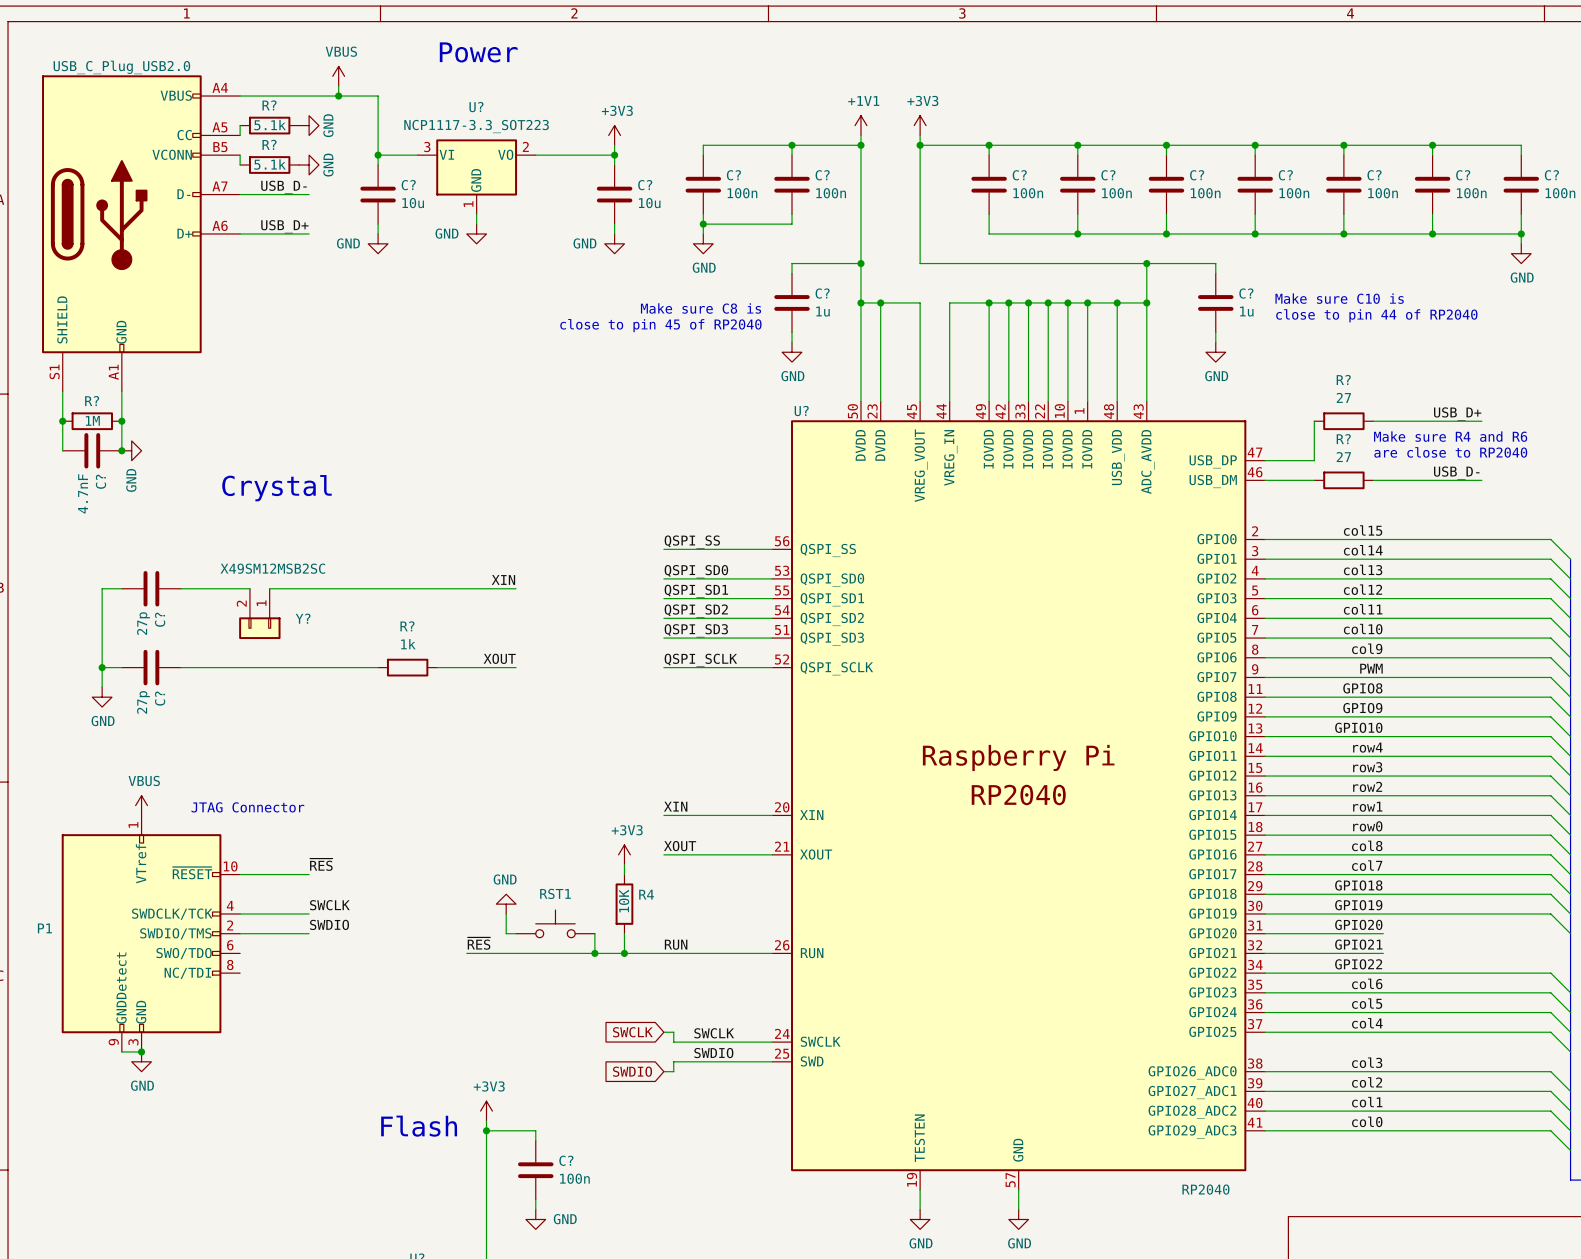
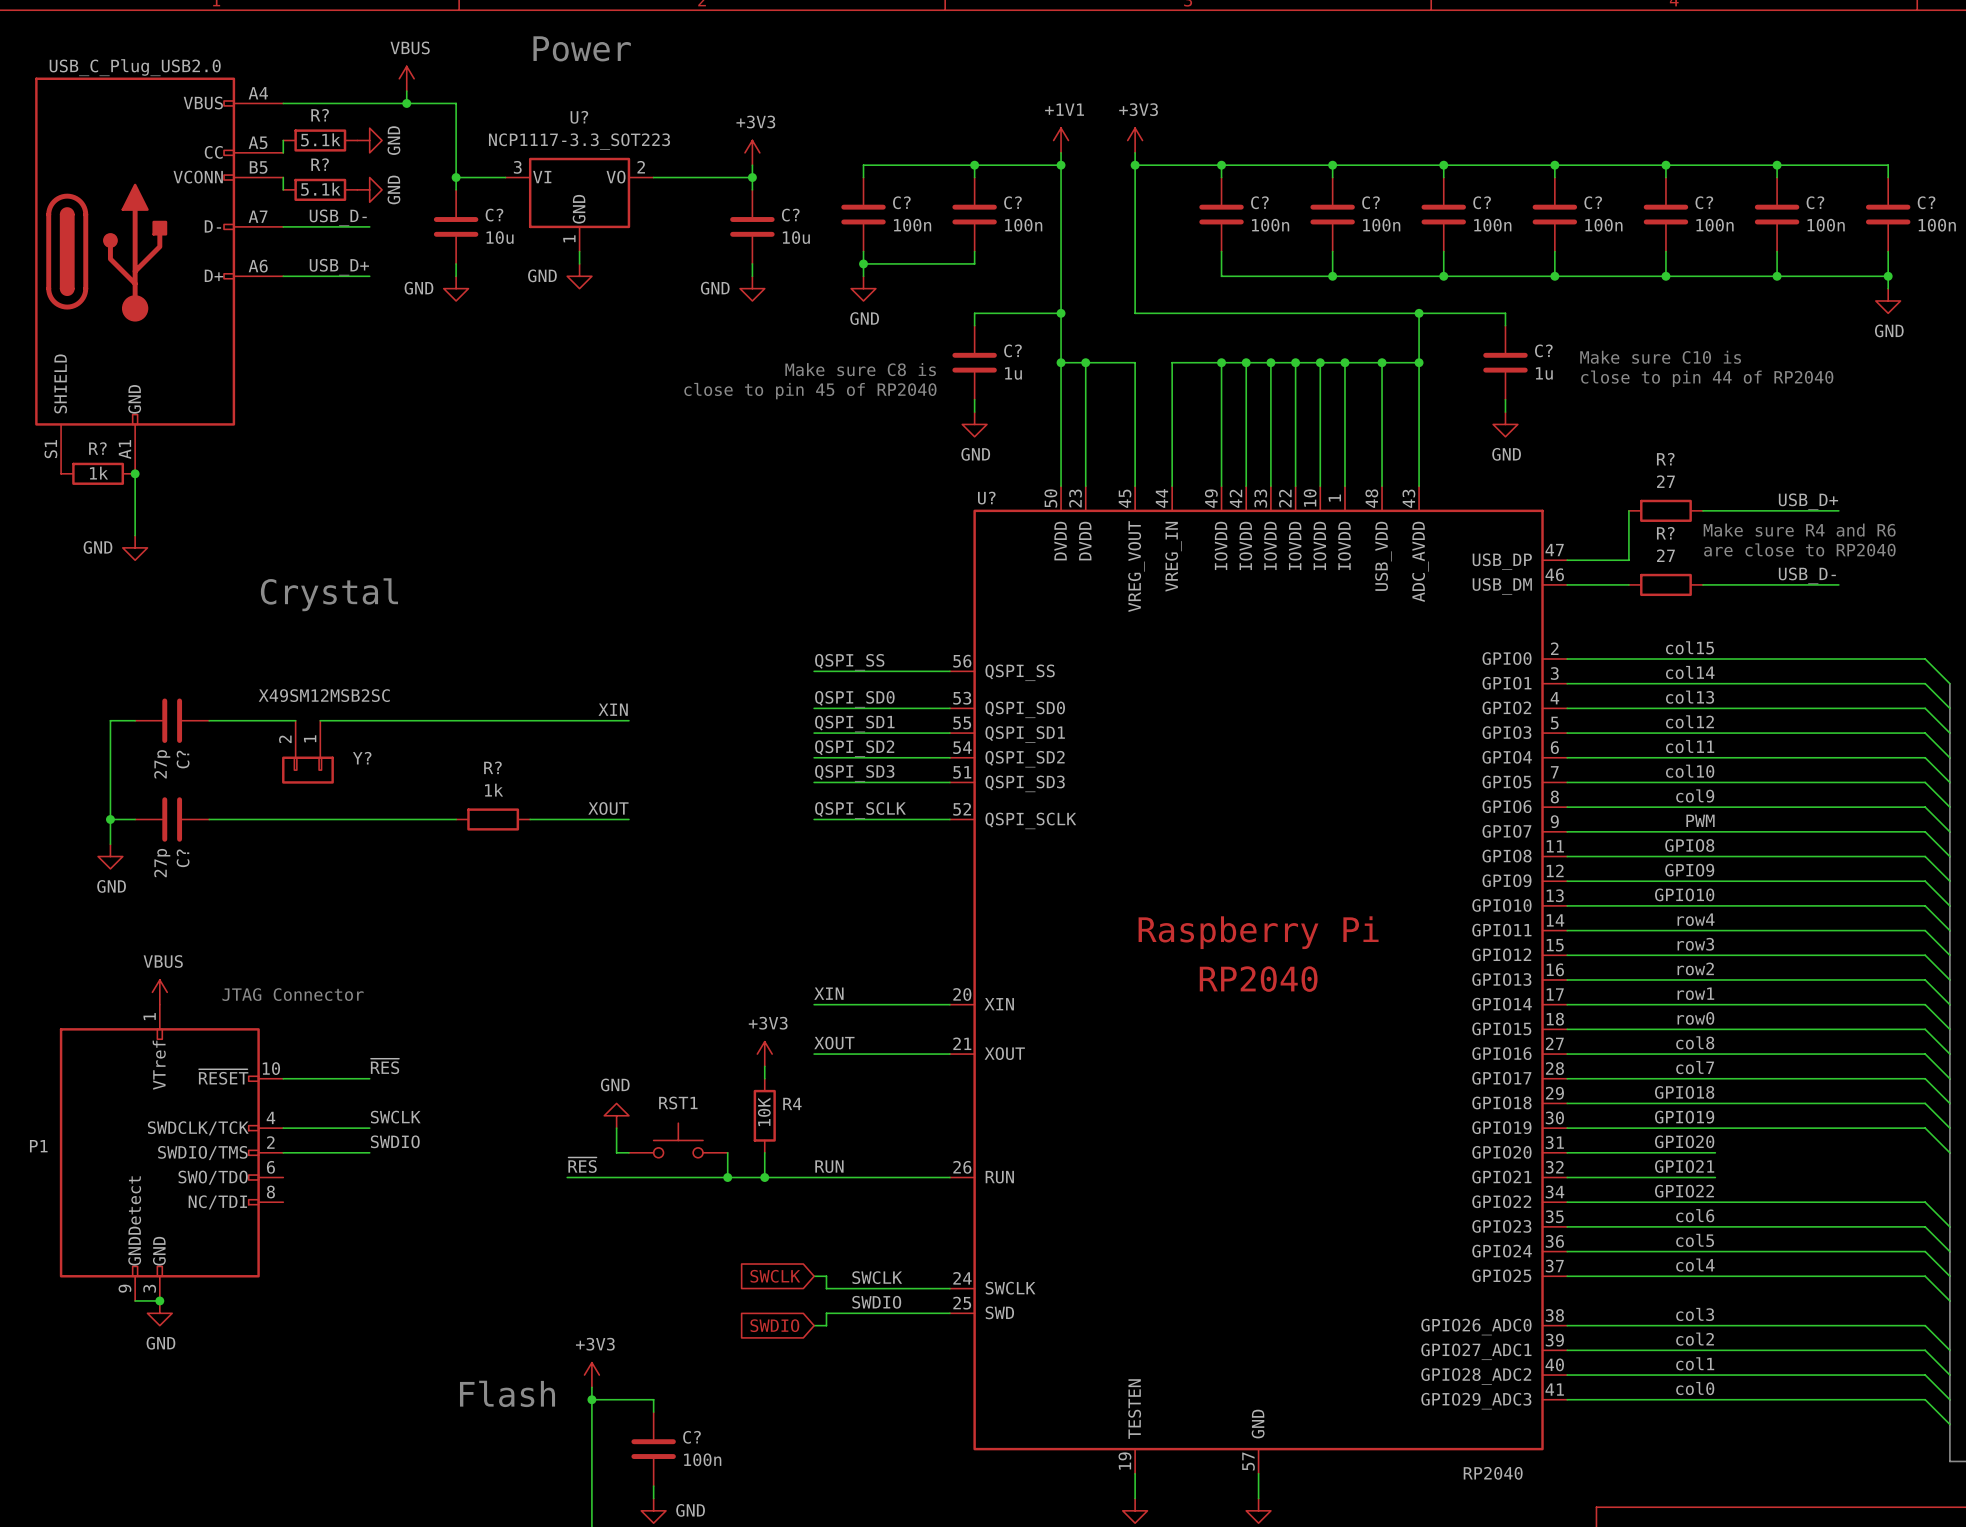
wire: (62, 391) (62, 450) -> none
R?: none -> 1k (98, 473)
junction: none -> (135, 473)
junction: (62, 421) -> none
R?: 1M (92, 421) -> none
junction: (121, 421) -> none
C?: 4.7nF (92, 450) -> none
junction: (121, 450) -> none
power symbol rotation: 0° (131, 450) -> 90° clockwise (135, 547)

